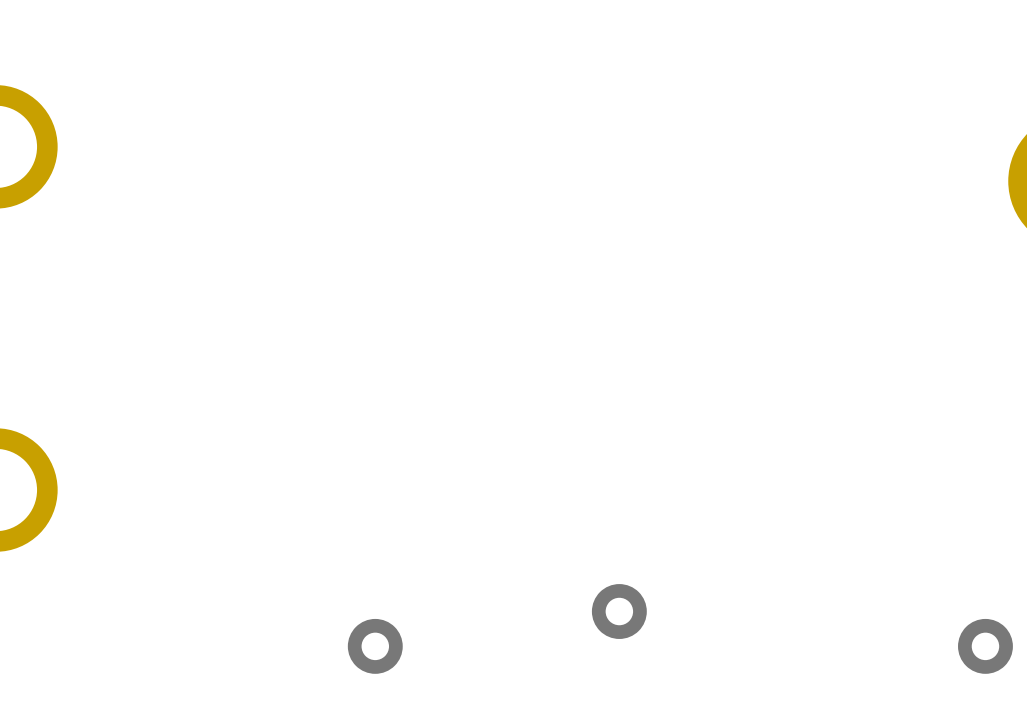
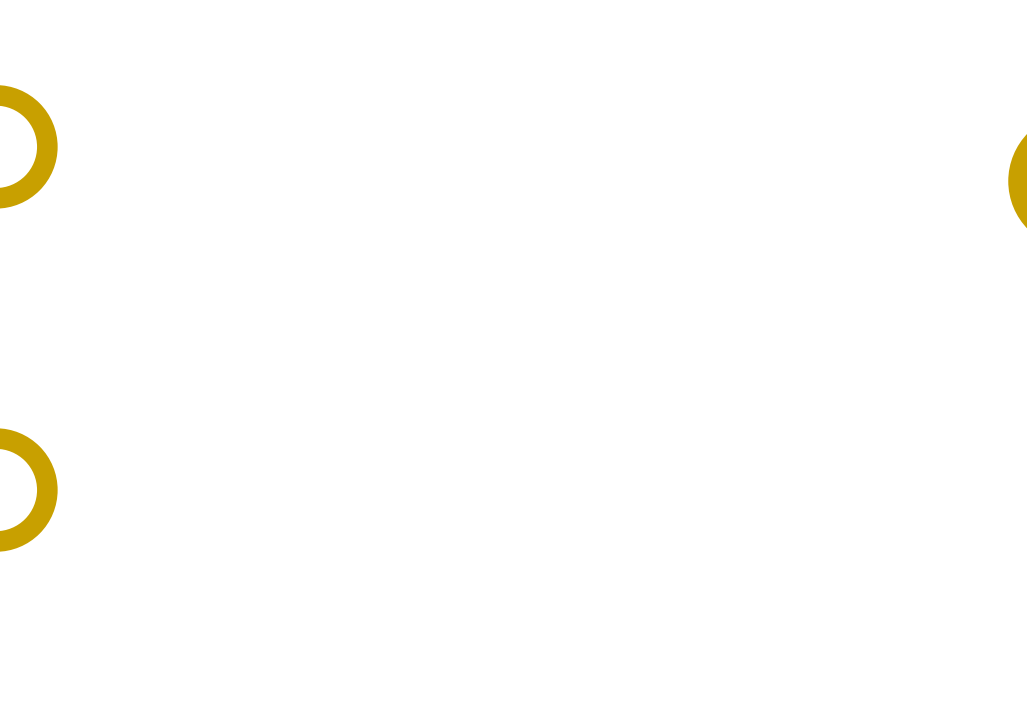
via: (619, 611) -> none
via: (375, 646) -> none
via: (985, 646) -> none

